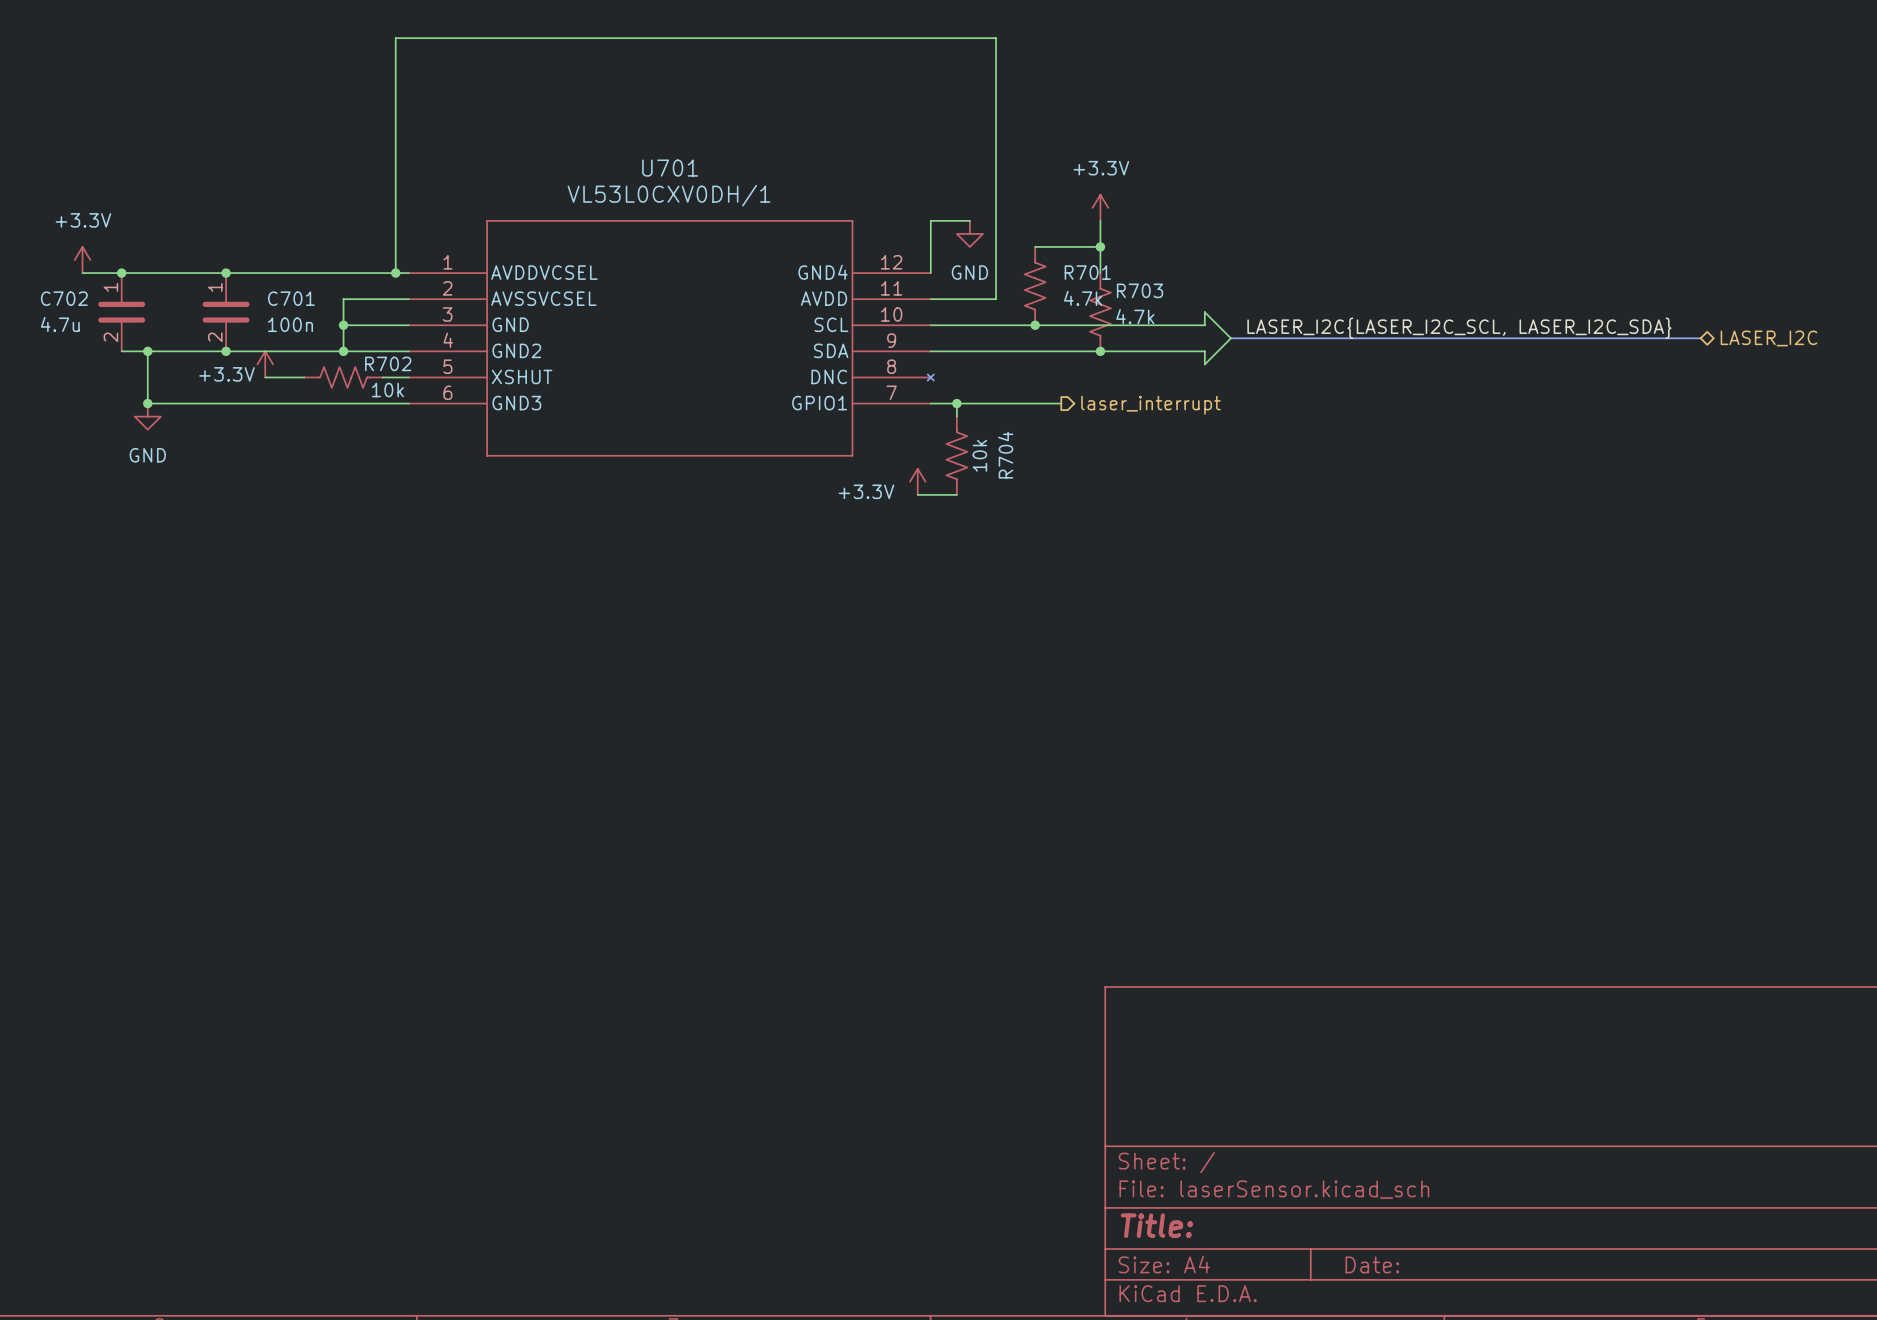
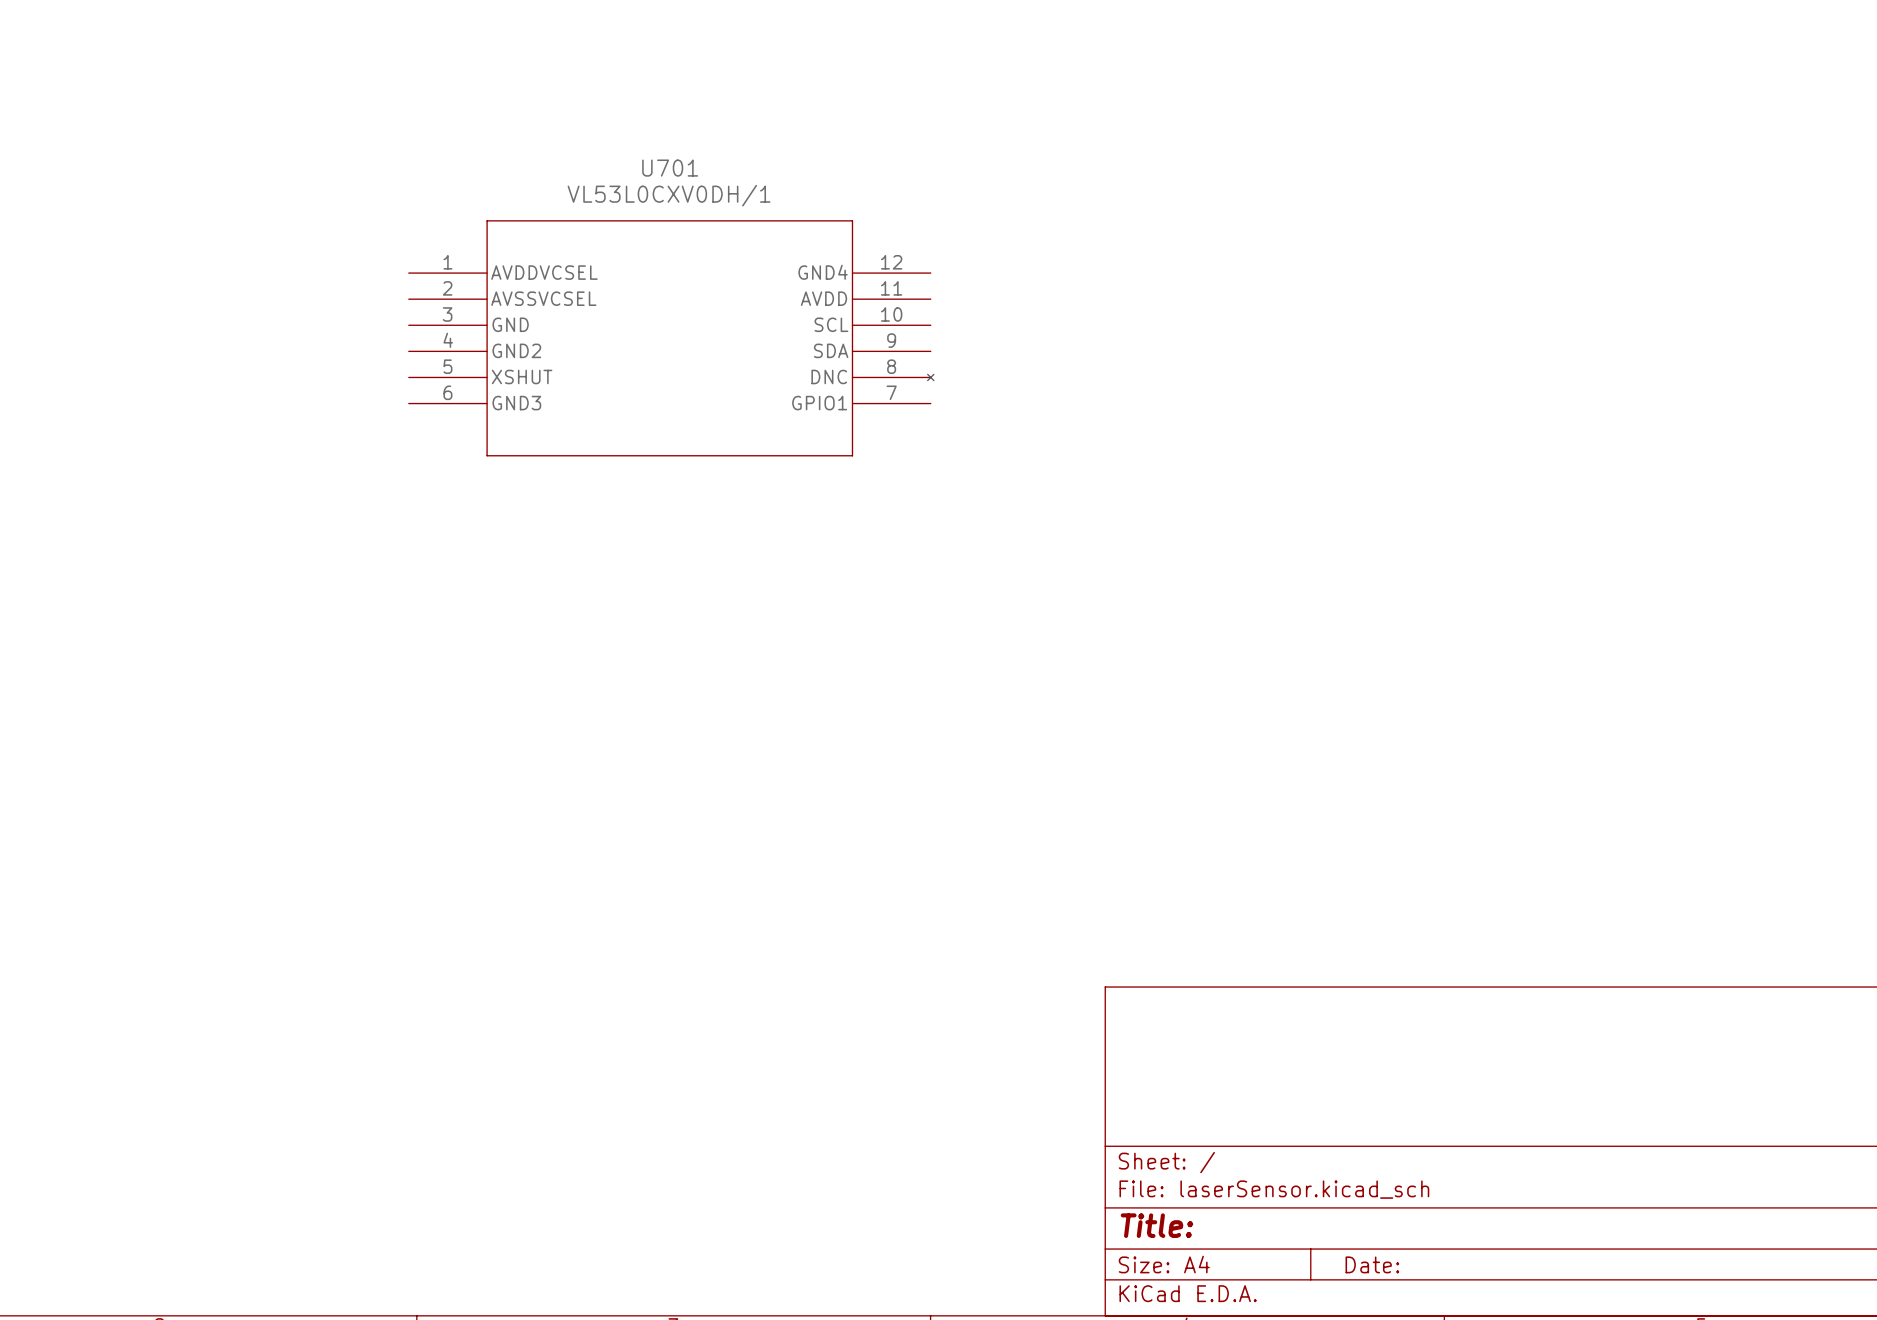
power symbol: +3.3V (1100, 207) -> none
wire: (969, 220) (930, 220) (930, 273) -> none
wire: (1100, 220) (1100, 273) -> none
power symbol: GND (969, 233) -> none
wire: (1035, 246) (1100, 246) -> none
junction: (1100, 246) -> none
power symbol: +3.3V (82, 260) -> none
wire: (82, 273) (408, 273) -> none
junction: (121, 273) -> none
junction: (226, 273) -> none
wire: (395, 273) (395, 38) (996, 38) (996, 299) (930, 299) -> none
junction: (395, 273) -> none
R701: 4.7k (1035, 286) -> none
wire: (408, 299) (343, 299) (343, 351) -> none
C702: 4.7u (121, 312) -> none
C701: 100n (226, 312) -> none
R703: 4.7k (1100, 312) -> none
wire: (343, 325) (408, 325) -> none
junction: (343, 325) -> none
wire: (930, 325) (1204, 325) (1204, 312) (1230, 338) (1204, 364) (1204, 351) (930, 351) -> none
junction: (1035, 325) -> none
label: LASER_I2C{LASER_I2C_SCL, LASER_I2C_SDA} (1459, 328) -> none
bus: (1230, 338) (1700, 338) -> none
hierarchical label: LASER_I2C (1768, 338) -> none
wire: (121, 351) (408, 351) -> none
wire: (147, 351) (147, 403) (408, 403) -> none
junction: (147, 351) -> none
junction: (226, 351) -> none
junction: (343, 351) -> none
junction: (1100, 351) -> none
power symbol: +3.3V (265, 364) -> none
wire: (265, 377) (304, 377) -> none
R702: 10k (343, 377) -> none
wire: (382, 377) (408, 377) -> none
junction: (147, 403) -> none
wire: (930, 403) (1061, 403) -> none
wire: (956, 403) (956, 416) -> none
junction: (956, 403) -> none
hierarchical label: laser_interrupt (1150, 405) -> none
power symbol: GND (147, 416) -> none
R704: 10k (956, 455) -> none
power symbol: +3.3V (917, 481) -> none
wire: (917, 494) (956, 494) -> none

